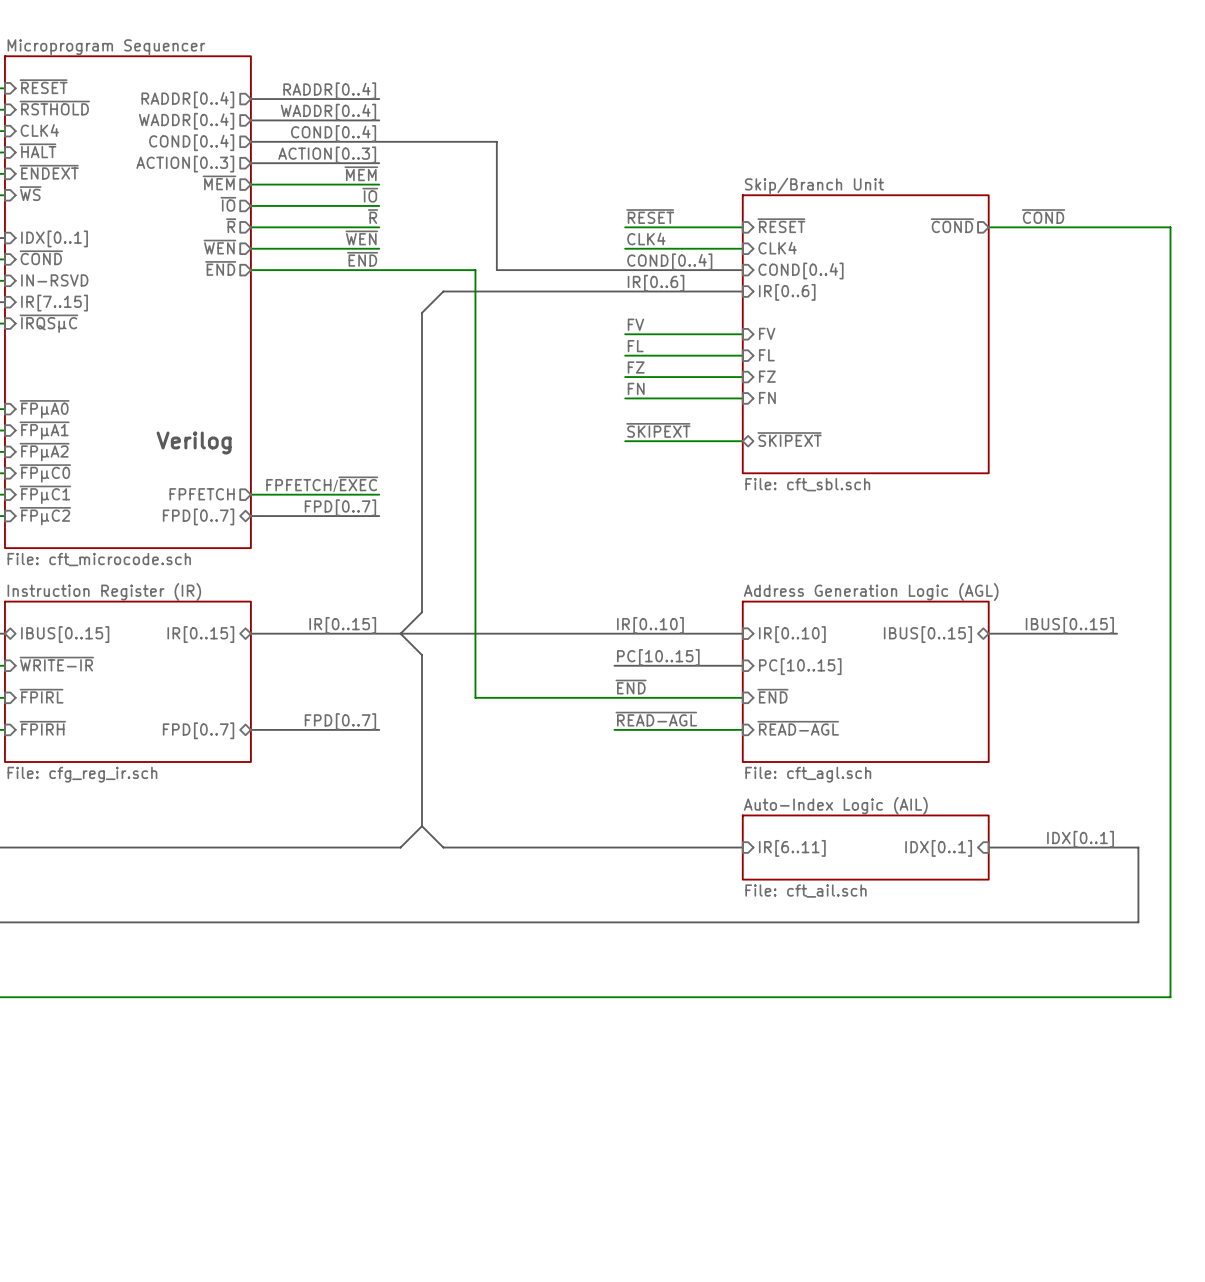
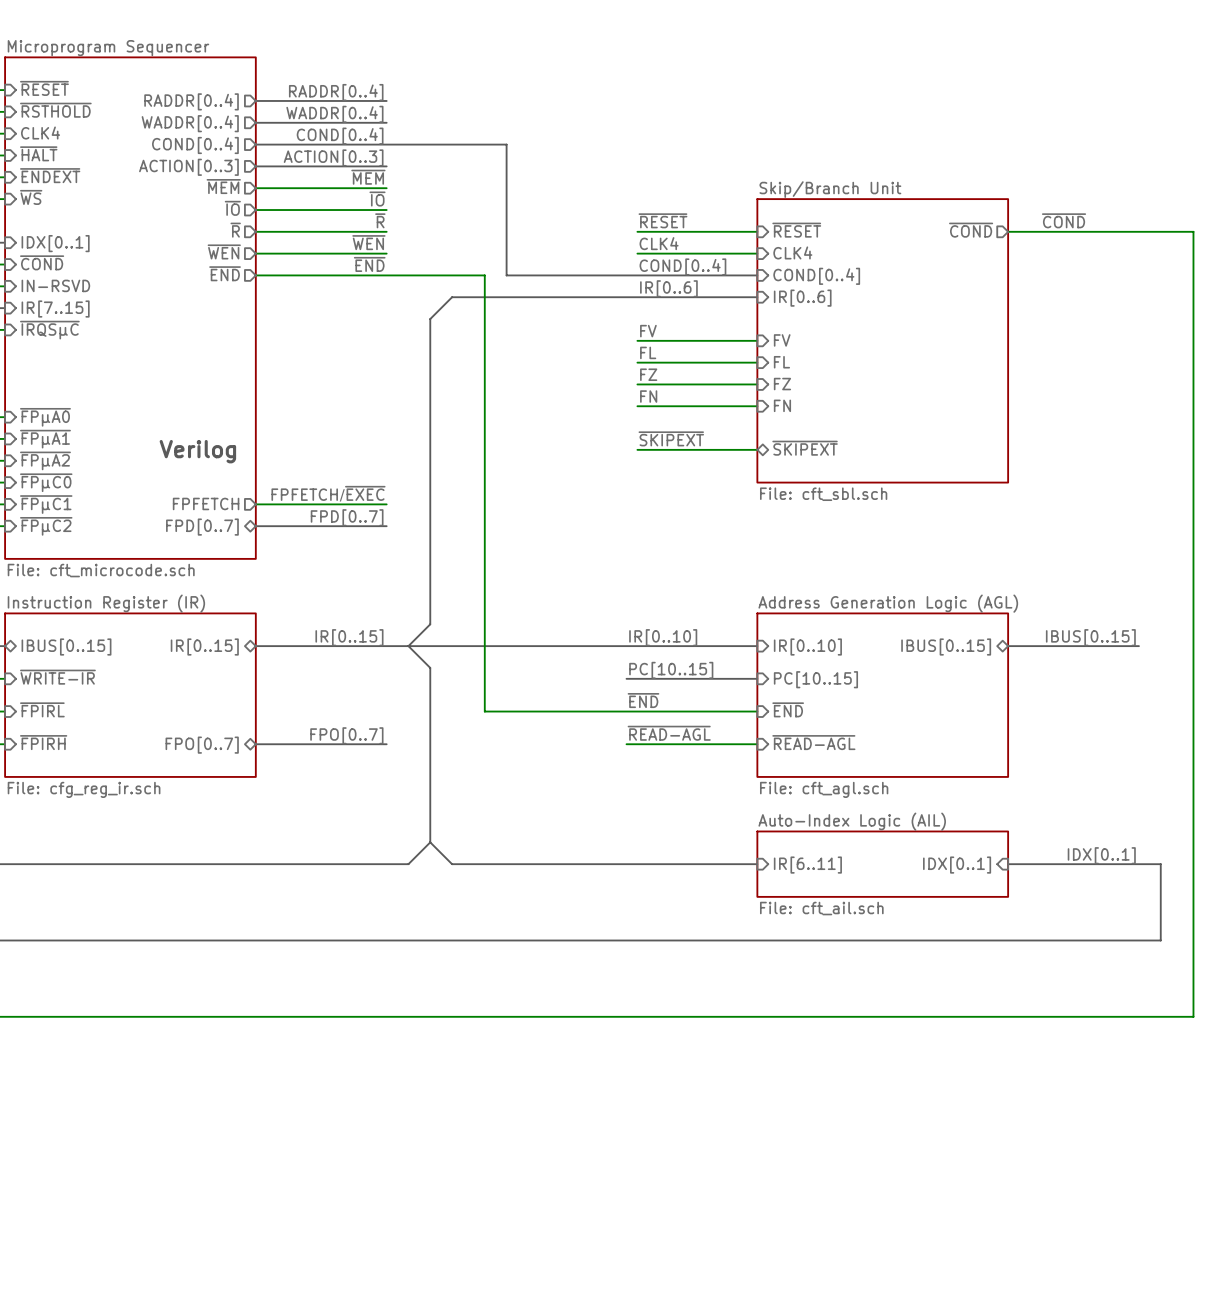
label: FPD[0..7] (340, 721) -> FPO[0..7] (346, 735)
sheet pin: FPD[0..7] (198, 730) -> FPO[0..7] (202, 745)

